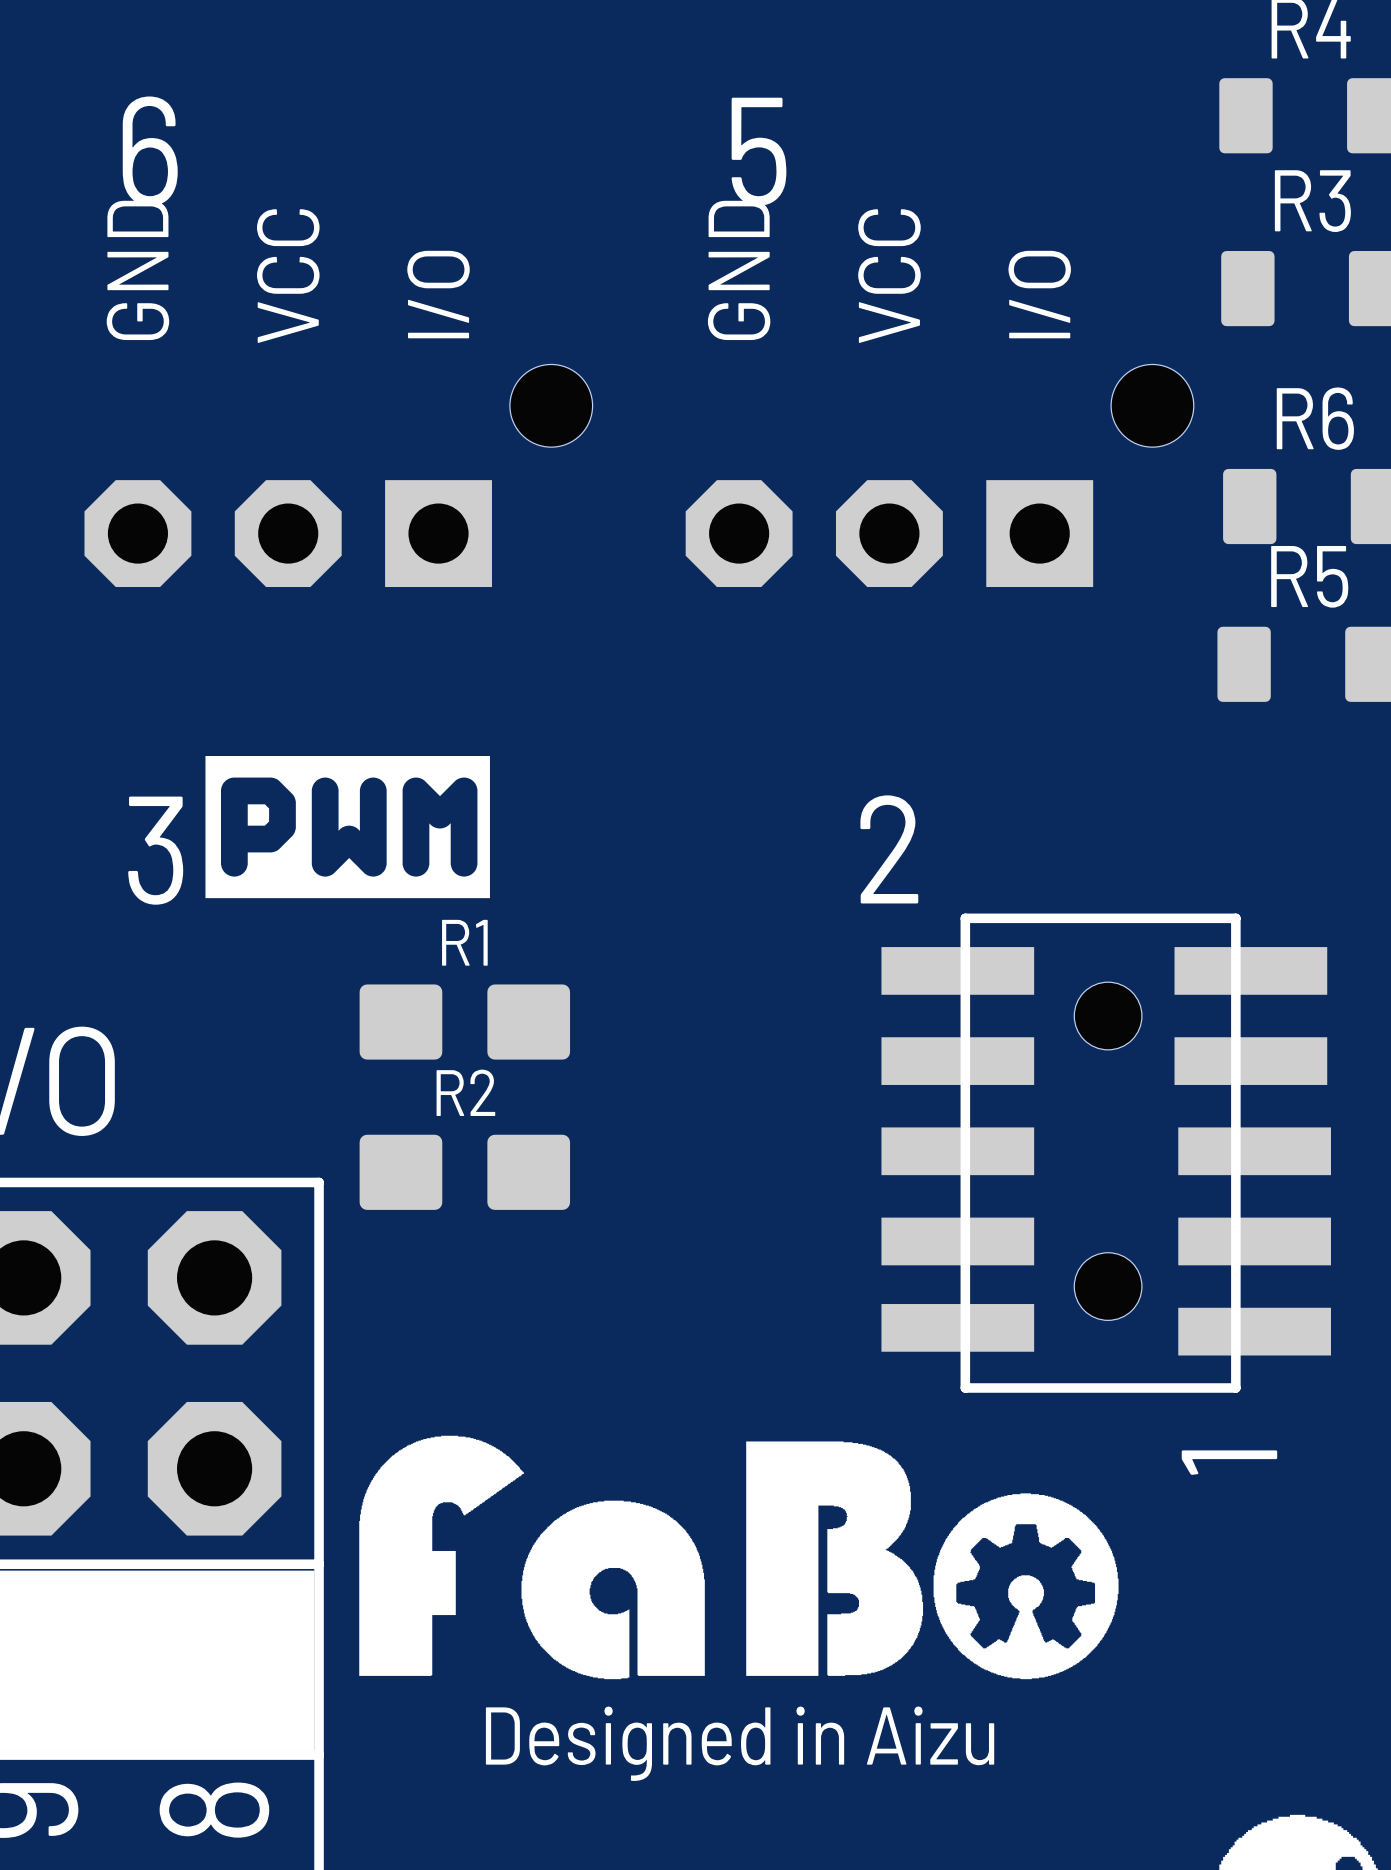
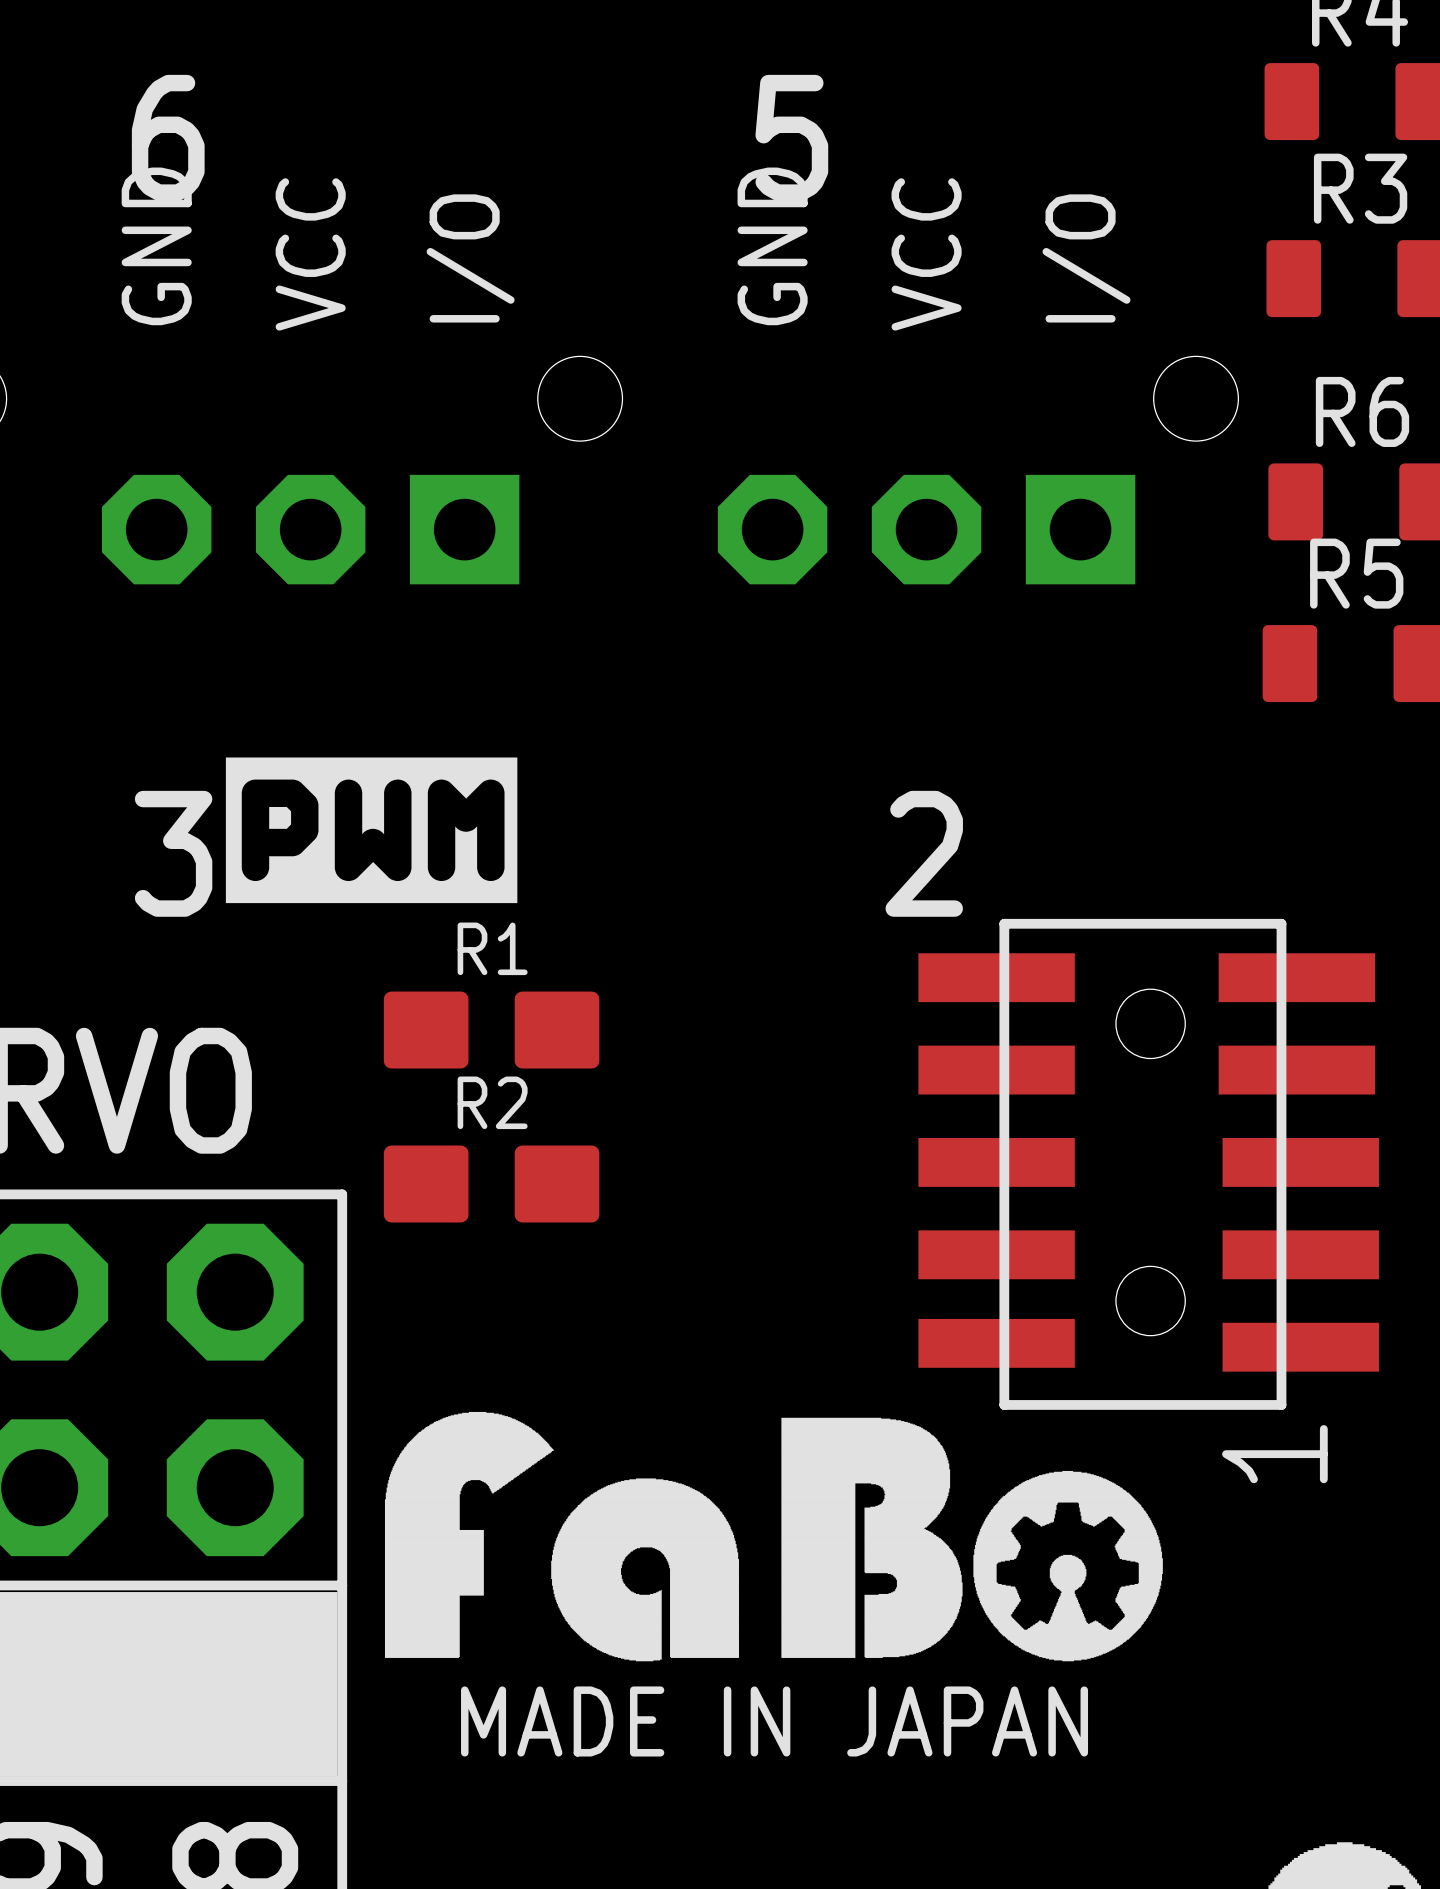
drawing position: (738, 1557) -> (773, 1536)
text: Designed in Aizu (740, 1743) -> MADE IN JAPAN (774, 1721)

